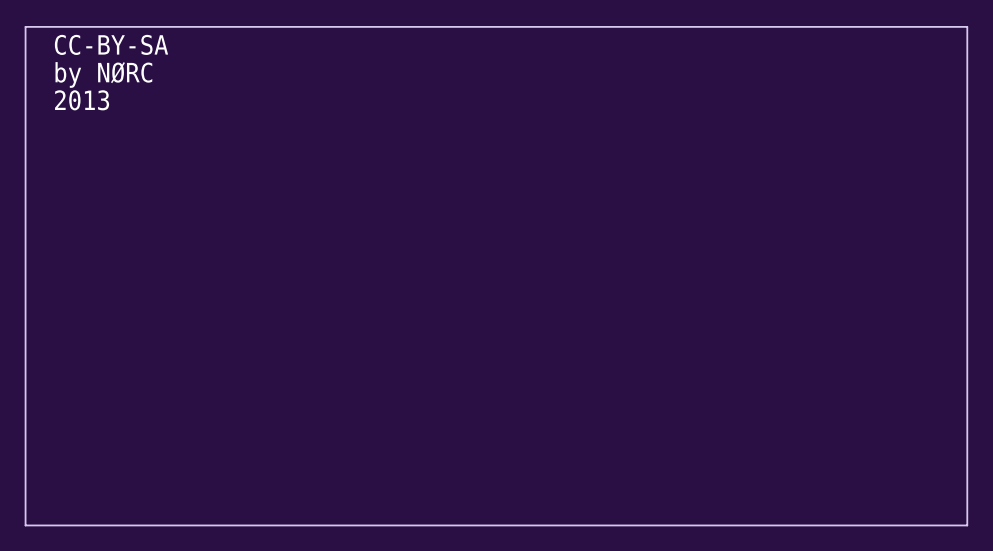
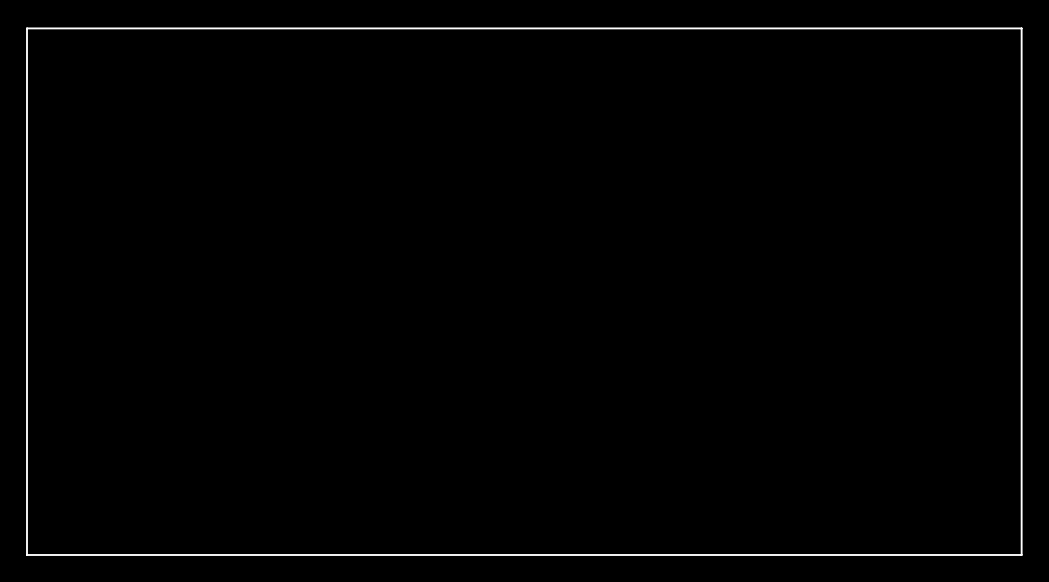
text: CC-BY-SA (111, 44) -> none
text: by NØRC (103, 74) -> none
text: 2013 (82, 100) -> none

